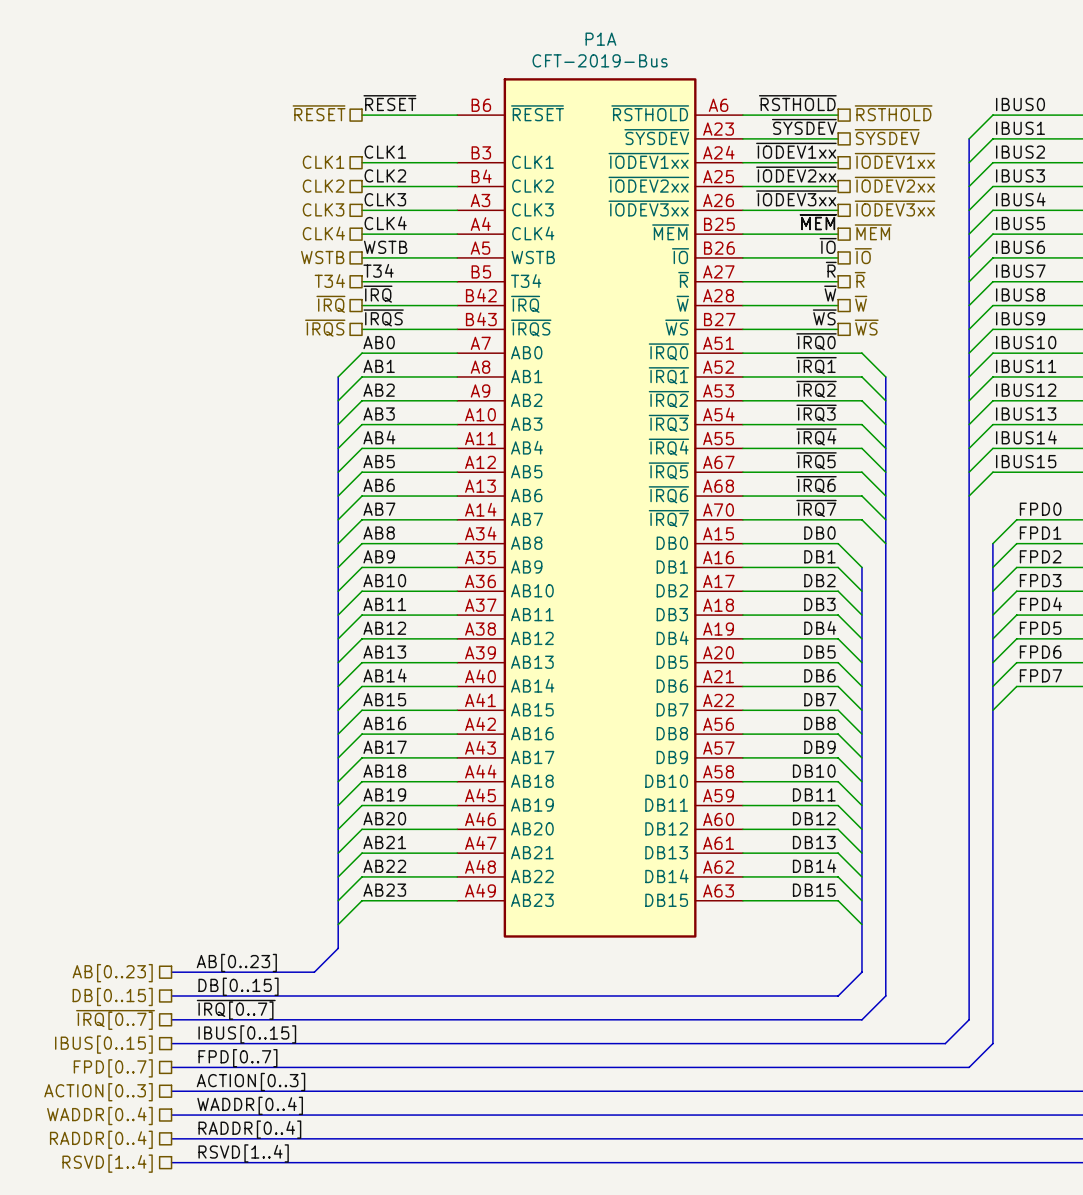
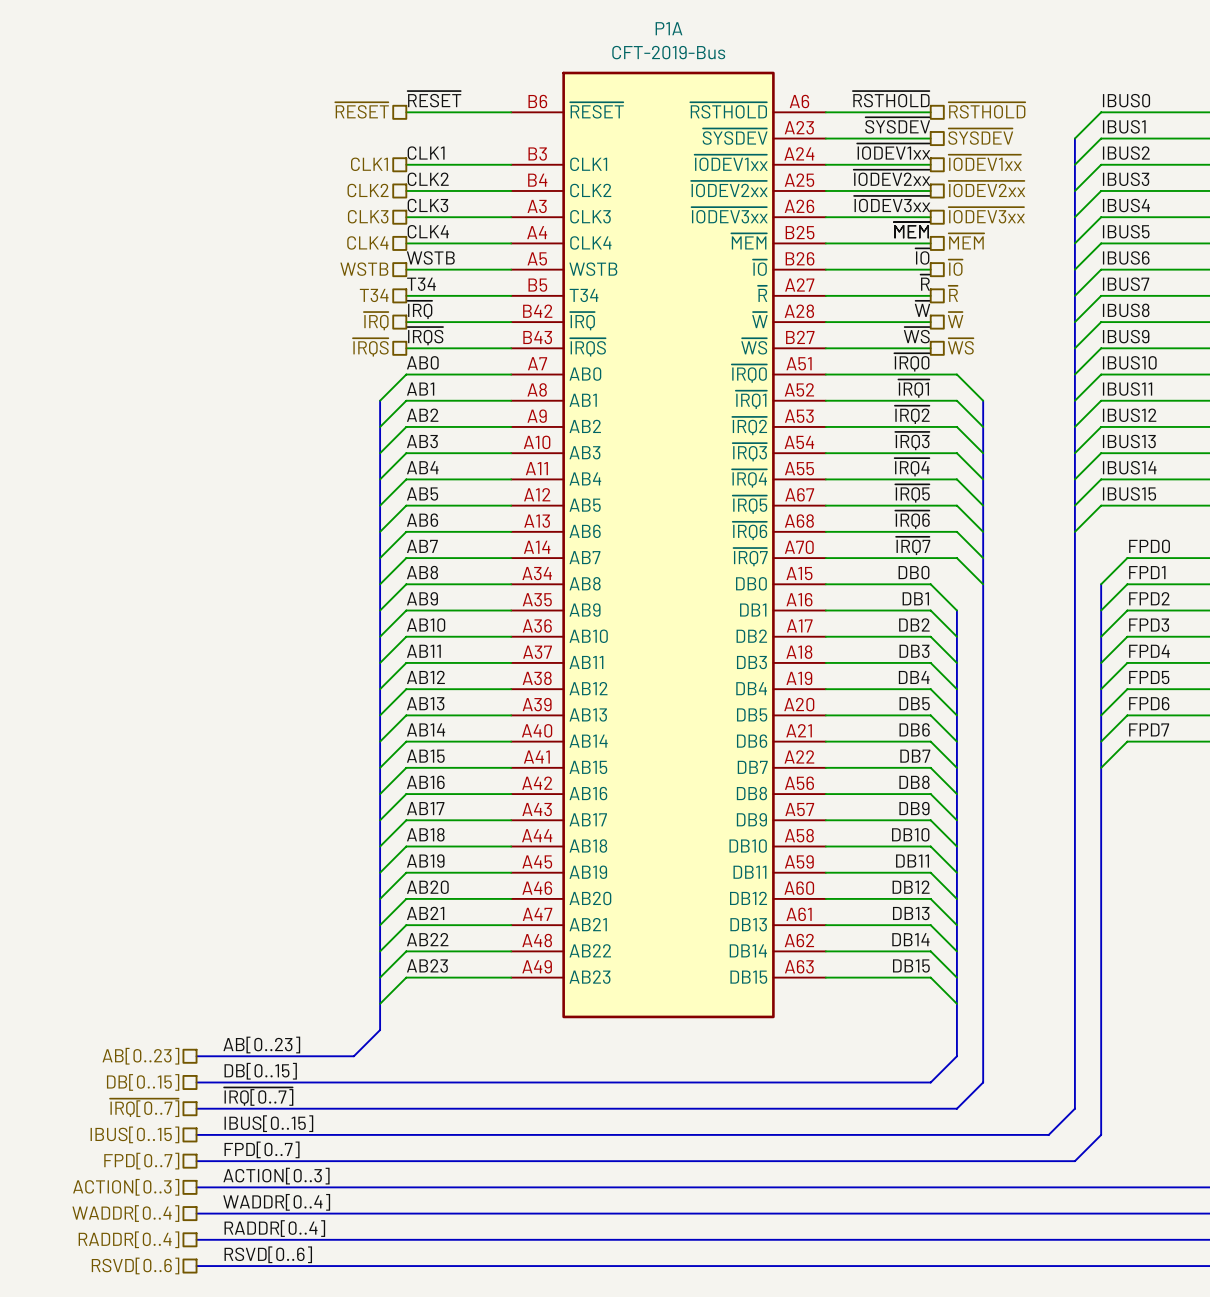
label: RSVD[1..4] (243, 1153) -> RSVD[0..6] (268, 1254)
hierarchical label: RSVD[1..4] (107, 1163) -> RSVD[0..6] (135, 1265)

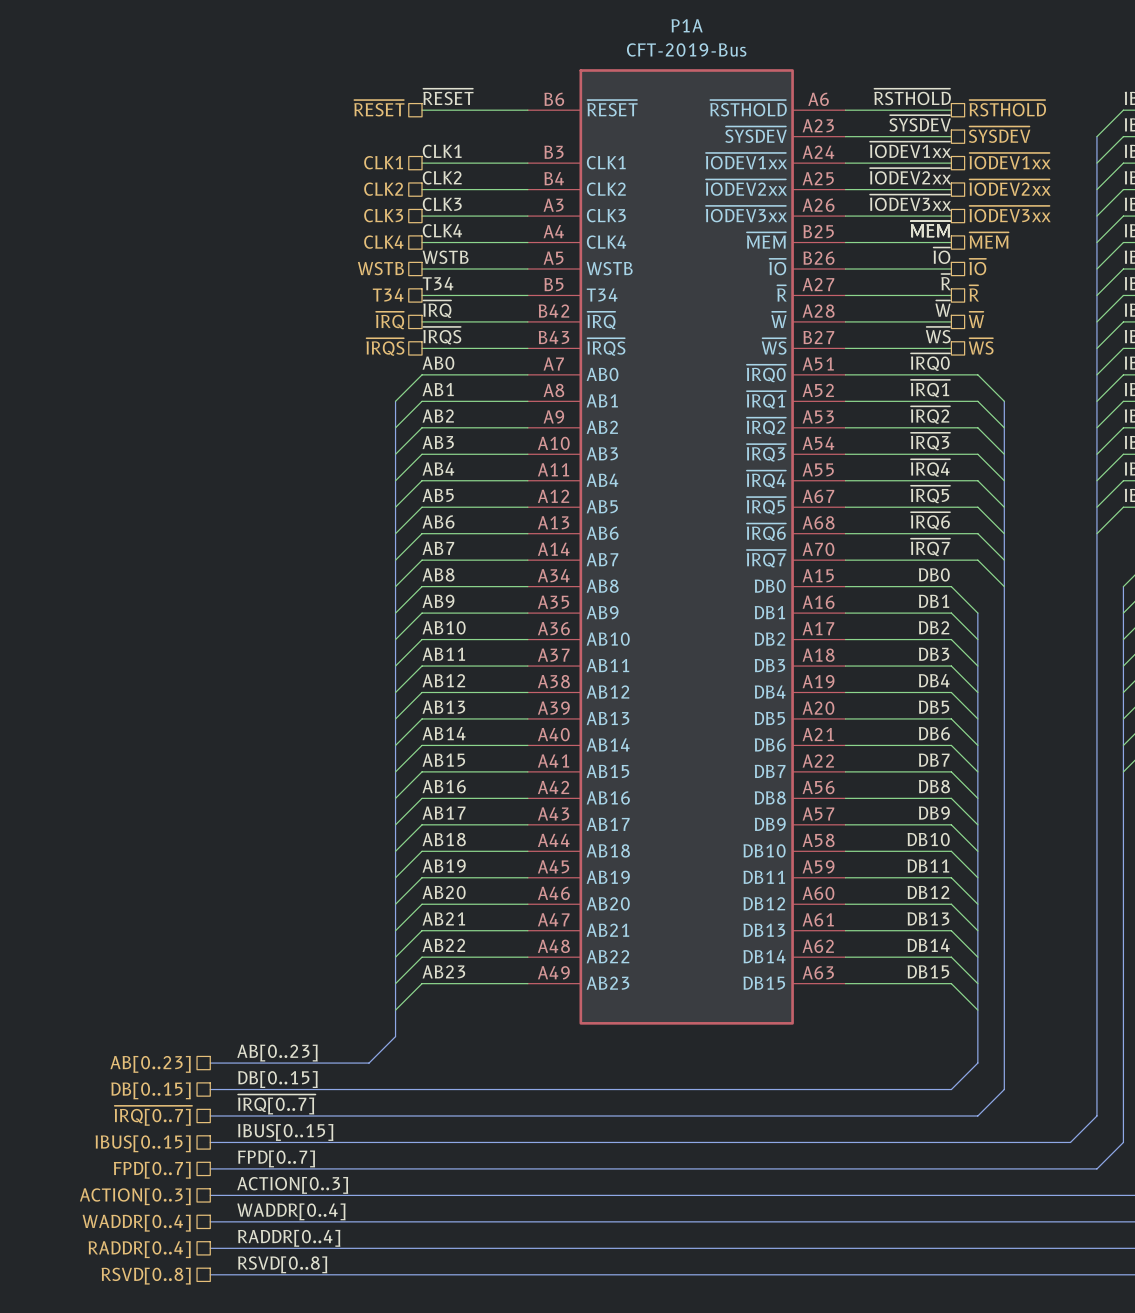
label: RSVD[0..6] (268, 1254) -> RSVD[0..8] (282, 1264)
hierarchical label: RSVD[0..6] (135, 1265) -> RSVD[0..8] (146, 1276)

